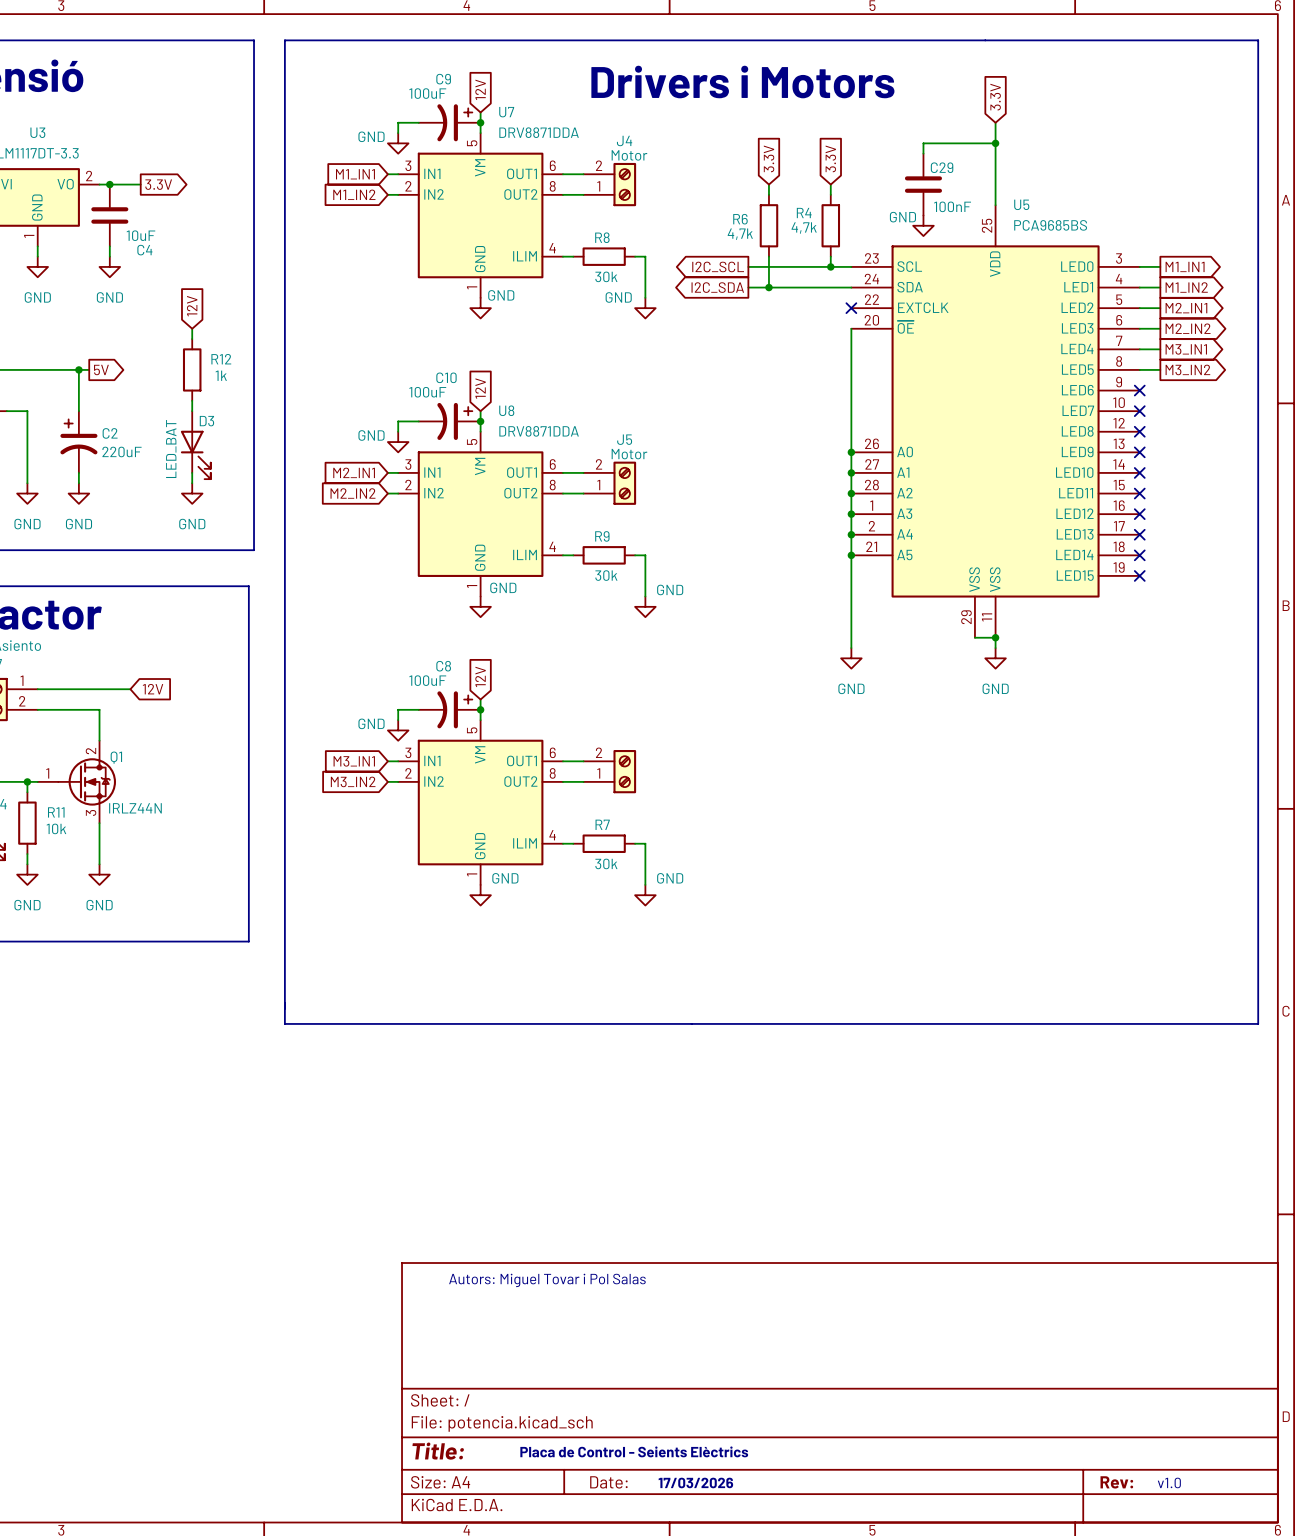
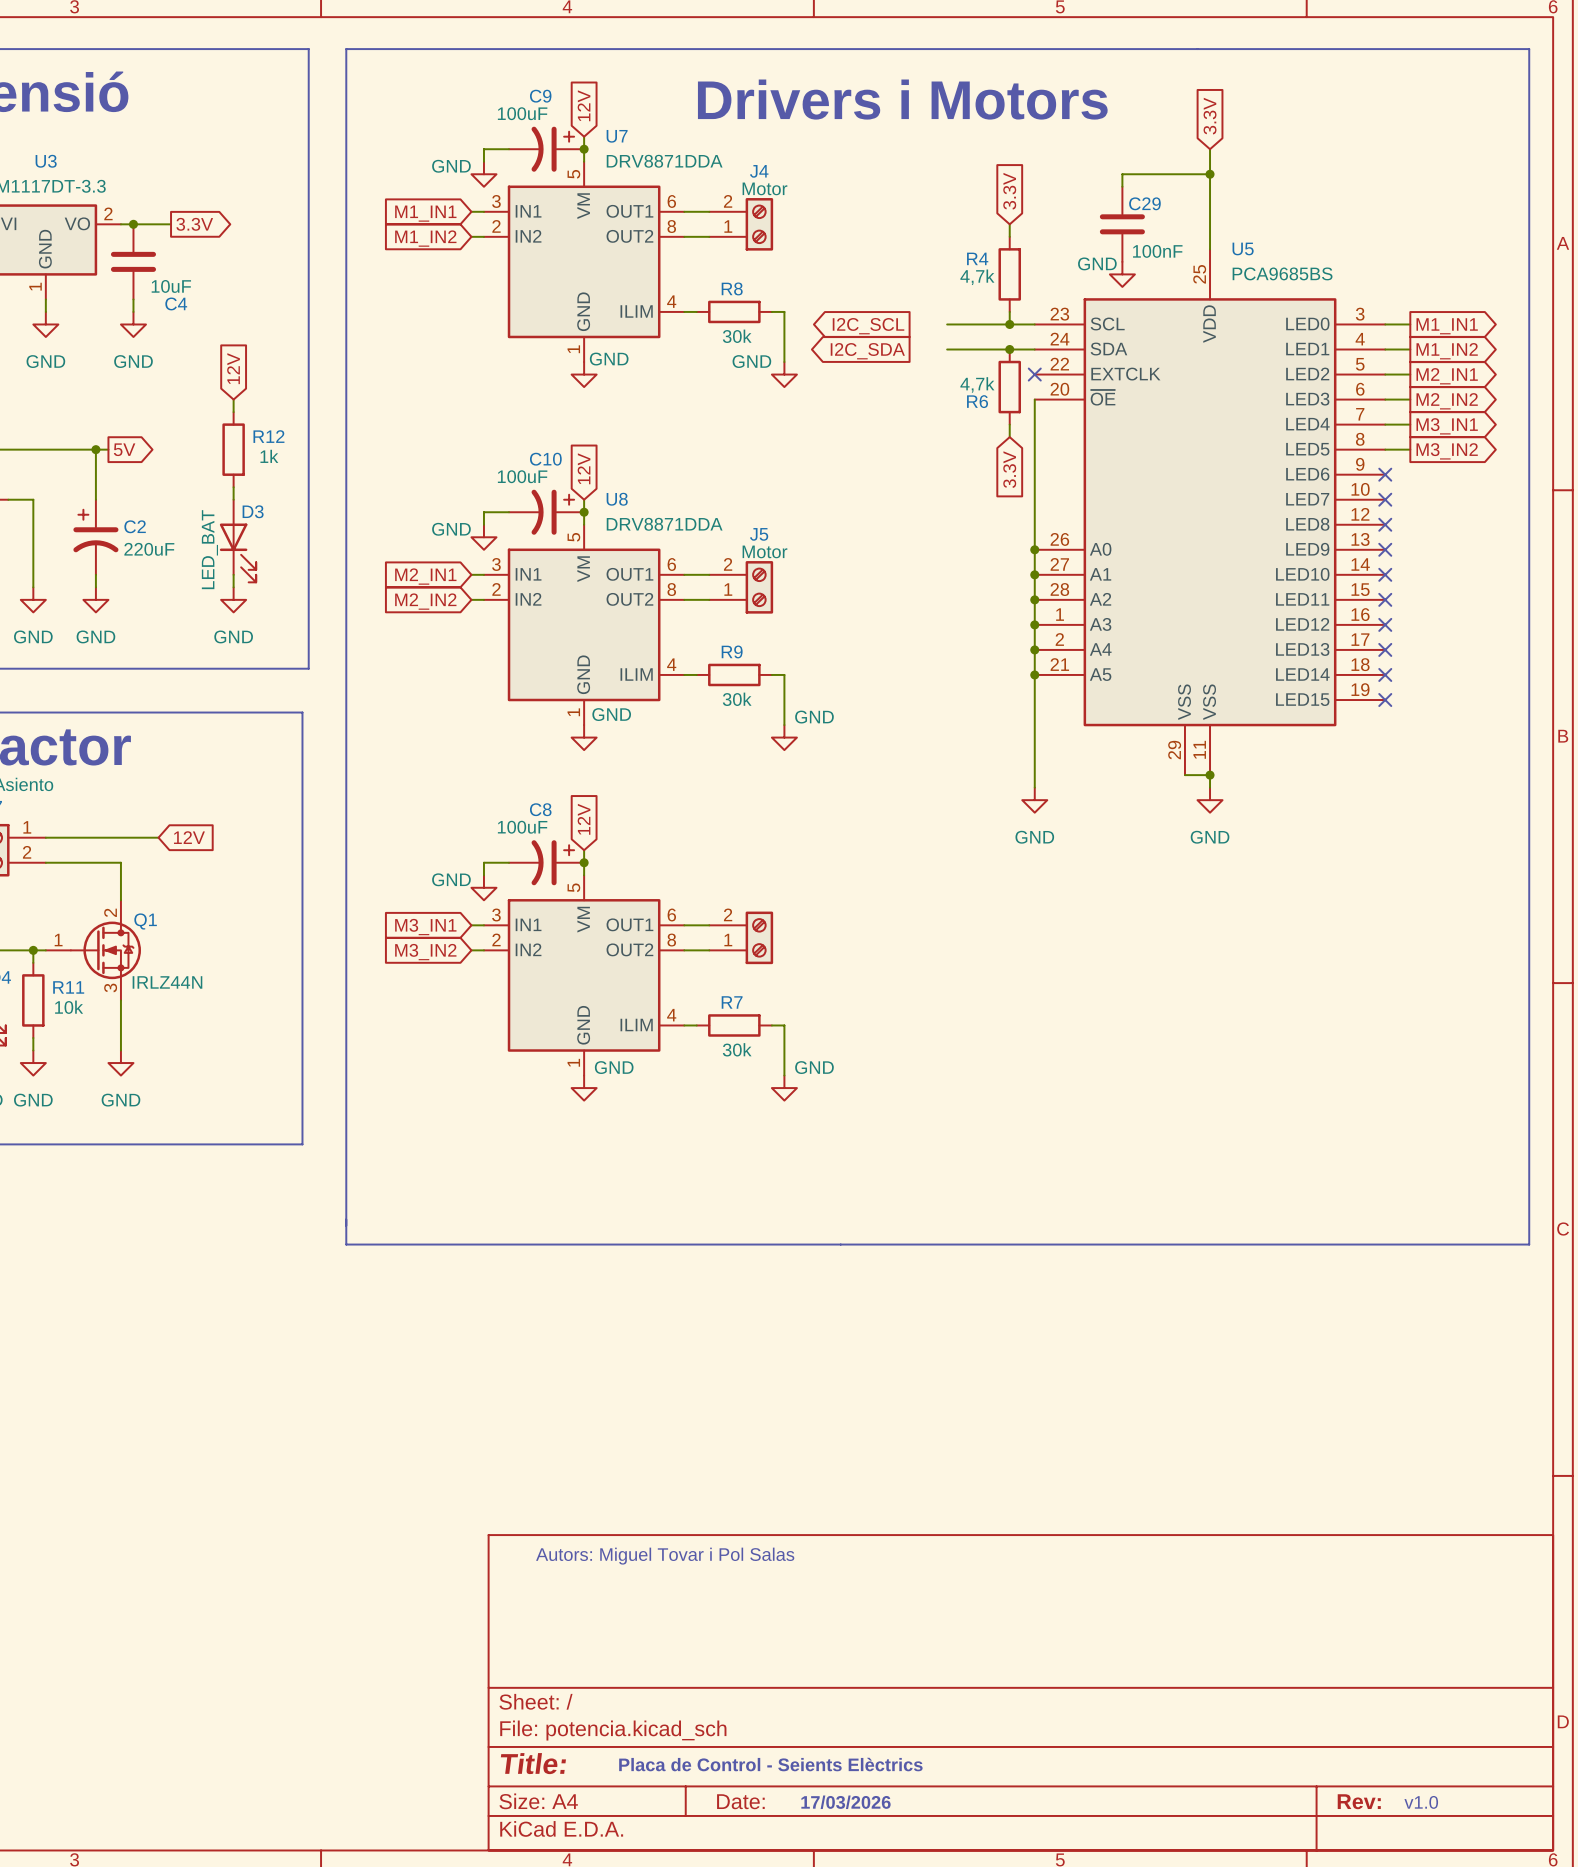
global label rotation: 0° (769, 158) -> 180° (1009, 469)
global label position: 3.3V (769, 158) -> 3.3V (1009, 469)
wire: (768, 184) (768, 194) -> (1009, 424) (1009, 437)
R6 name position: R6 (740, 219) -> R6 (977, 401)
R6 position: (768, 225) -> (1009, 387)
R6 value position: 4,7k (740, 234) -> 4,7k (977, 384)
wire: (768, 256) (768, 287) -> none
wire: (748, 266) (779, 266) -> none
wire: (748, 287) (779, 287) -> none
junction: (768, 287) -> none
junction: none -> (1009, 349)

